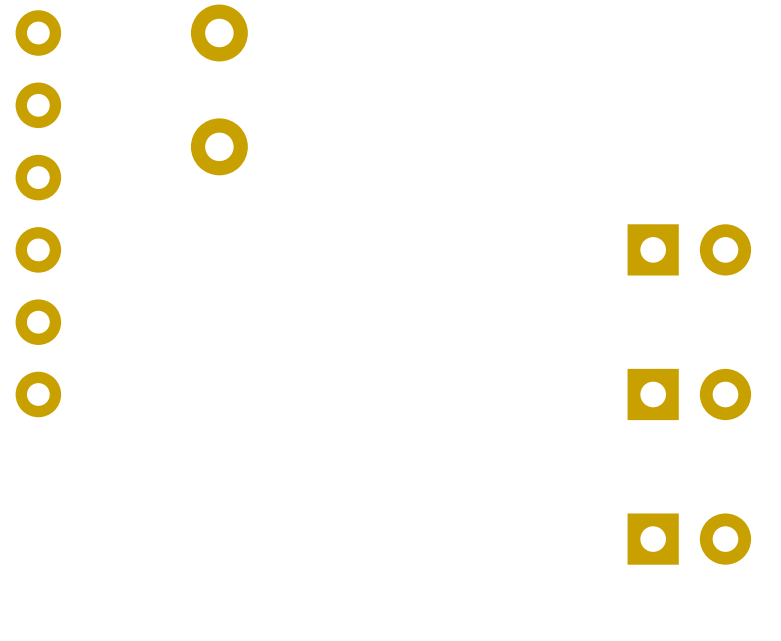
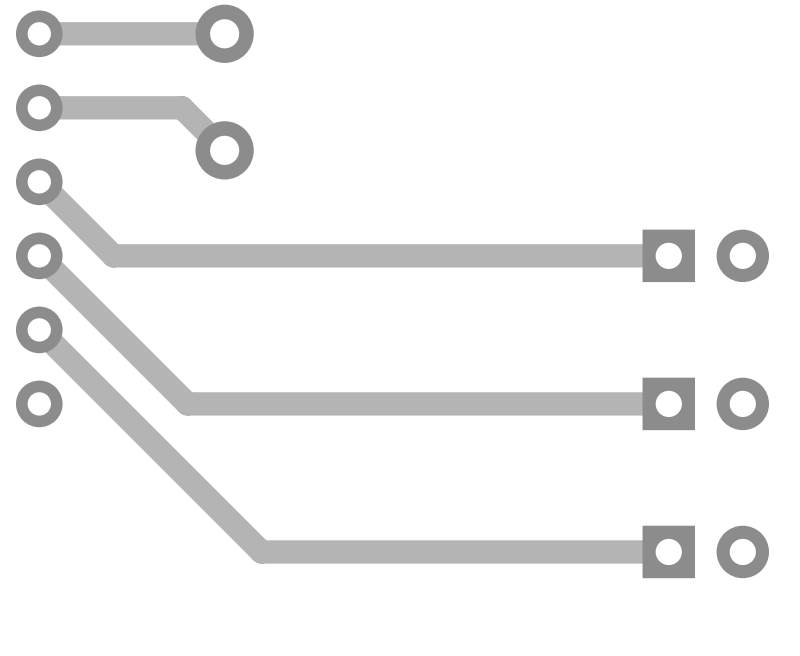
track: none -> (224, 33) (39, 33)
track: none -> (39, 107) (182, 107) (224, 150)
track: none -> (39, 181) (113, 255) (668, 255)
track: none -> (39, 255) (187, 403) (668, 403)
track: none -> (39, 329) (261, 551) (668, 551)

